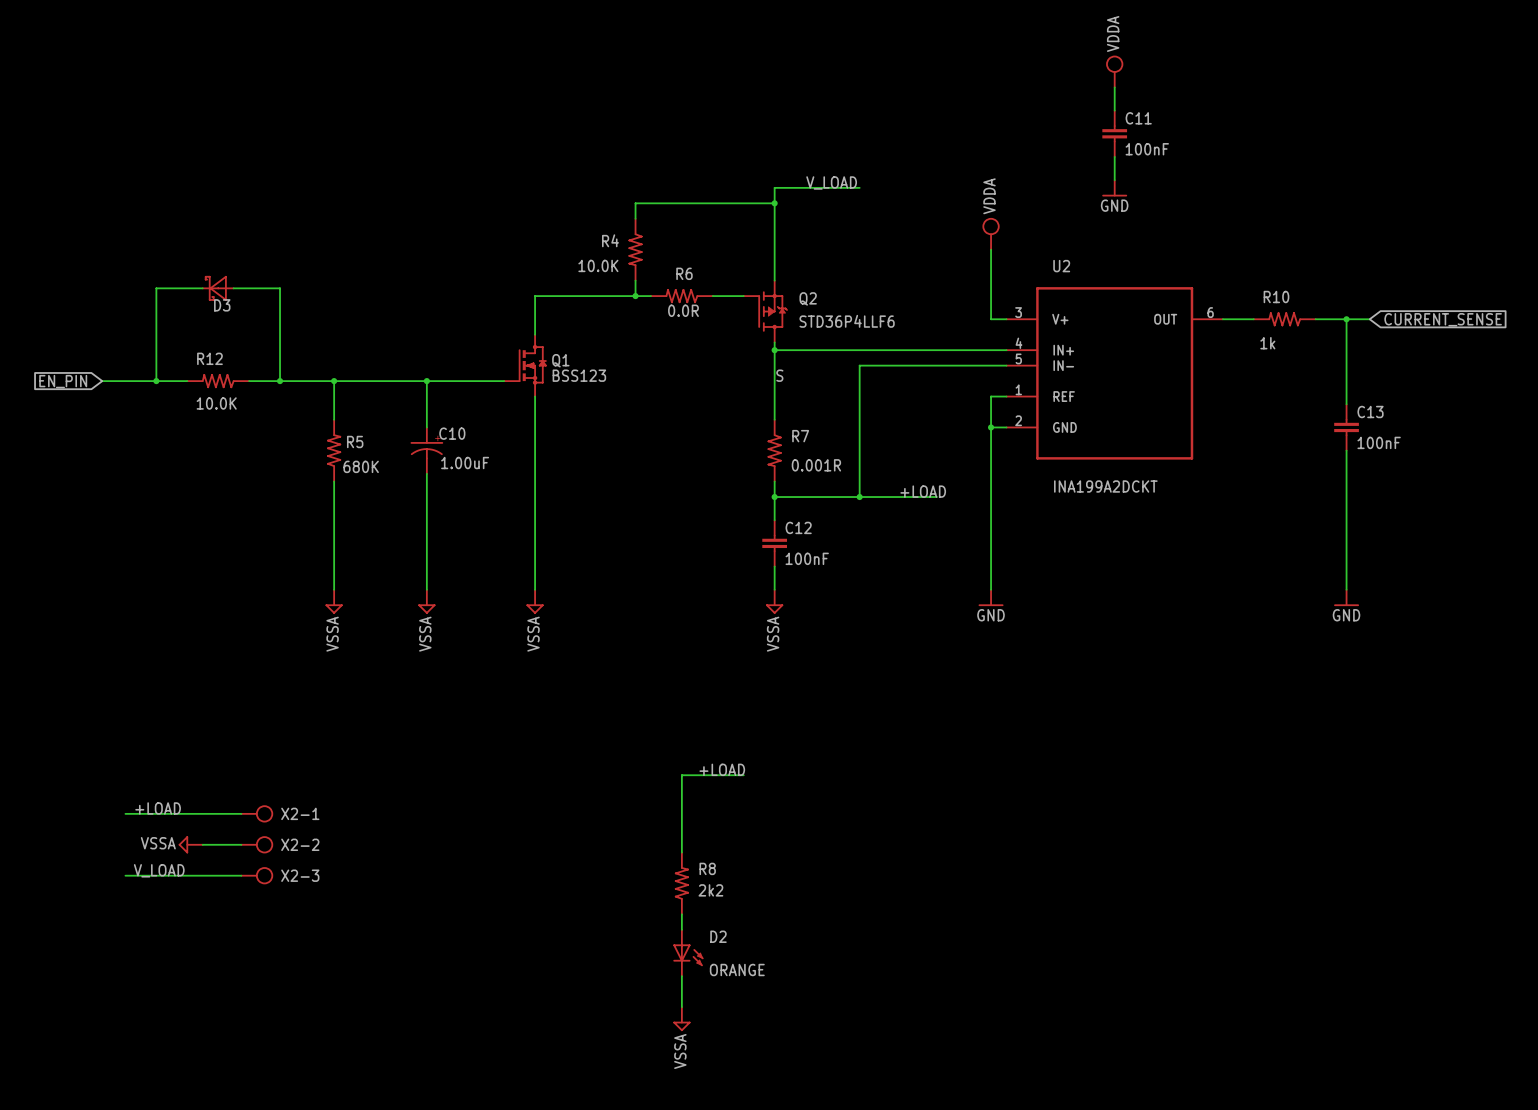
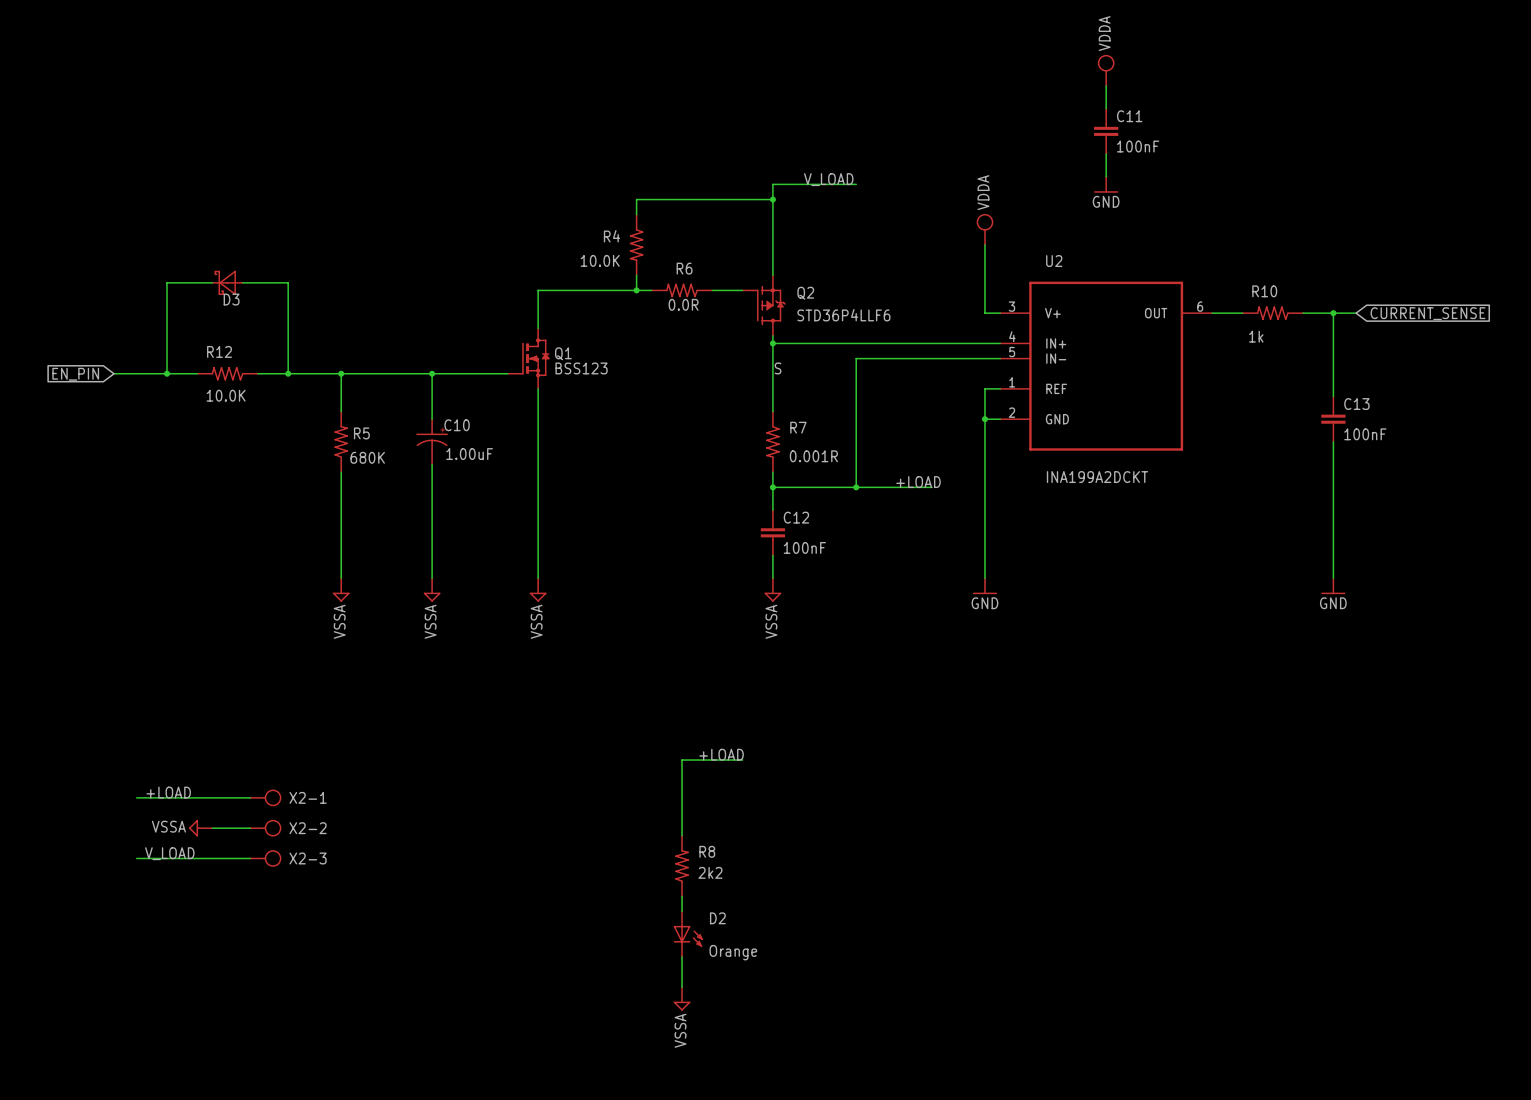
D2 value: ORANGE (737, 969) -> Orange (733, 952)

